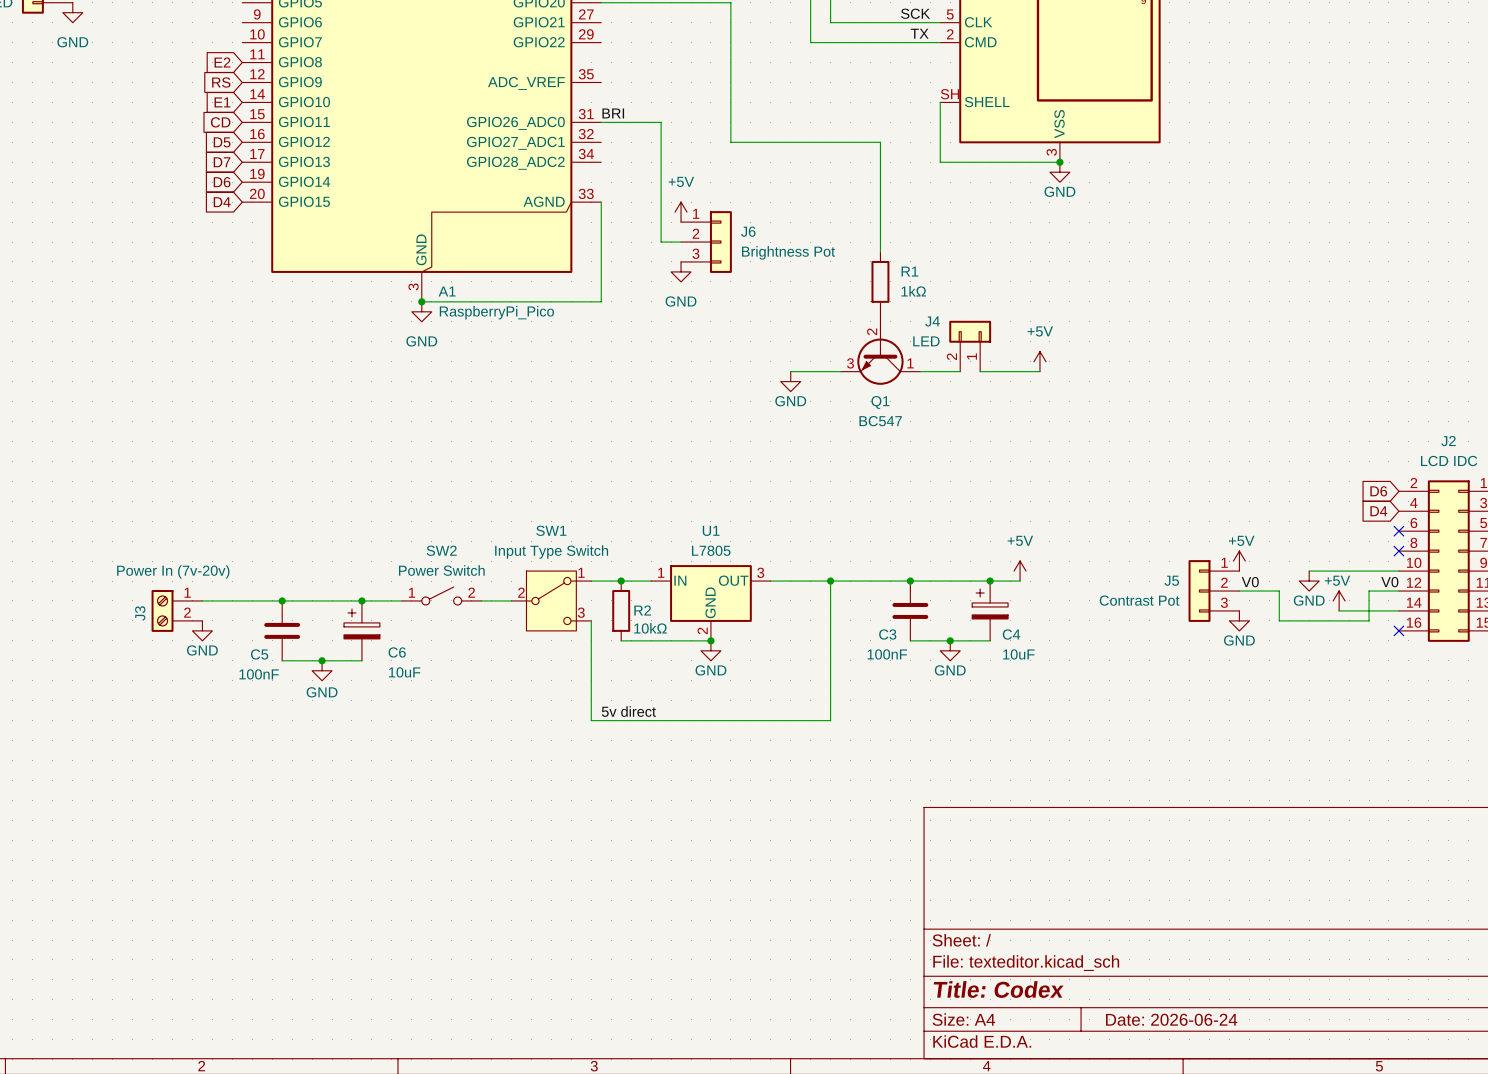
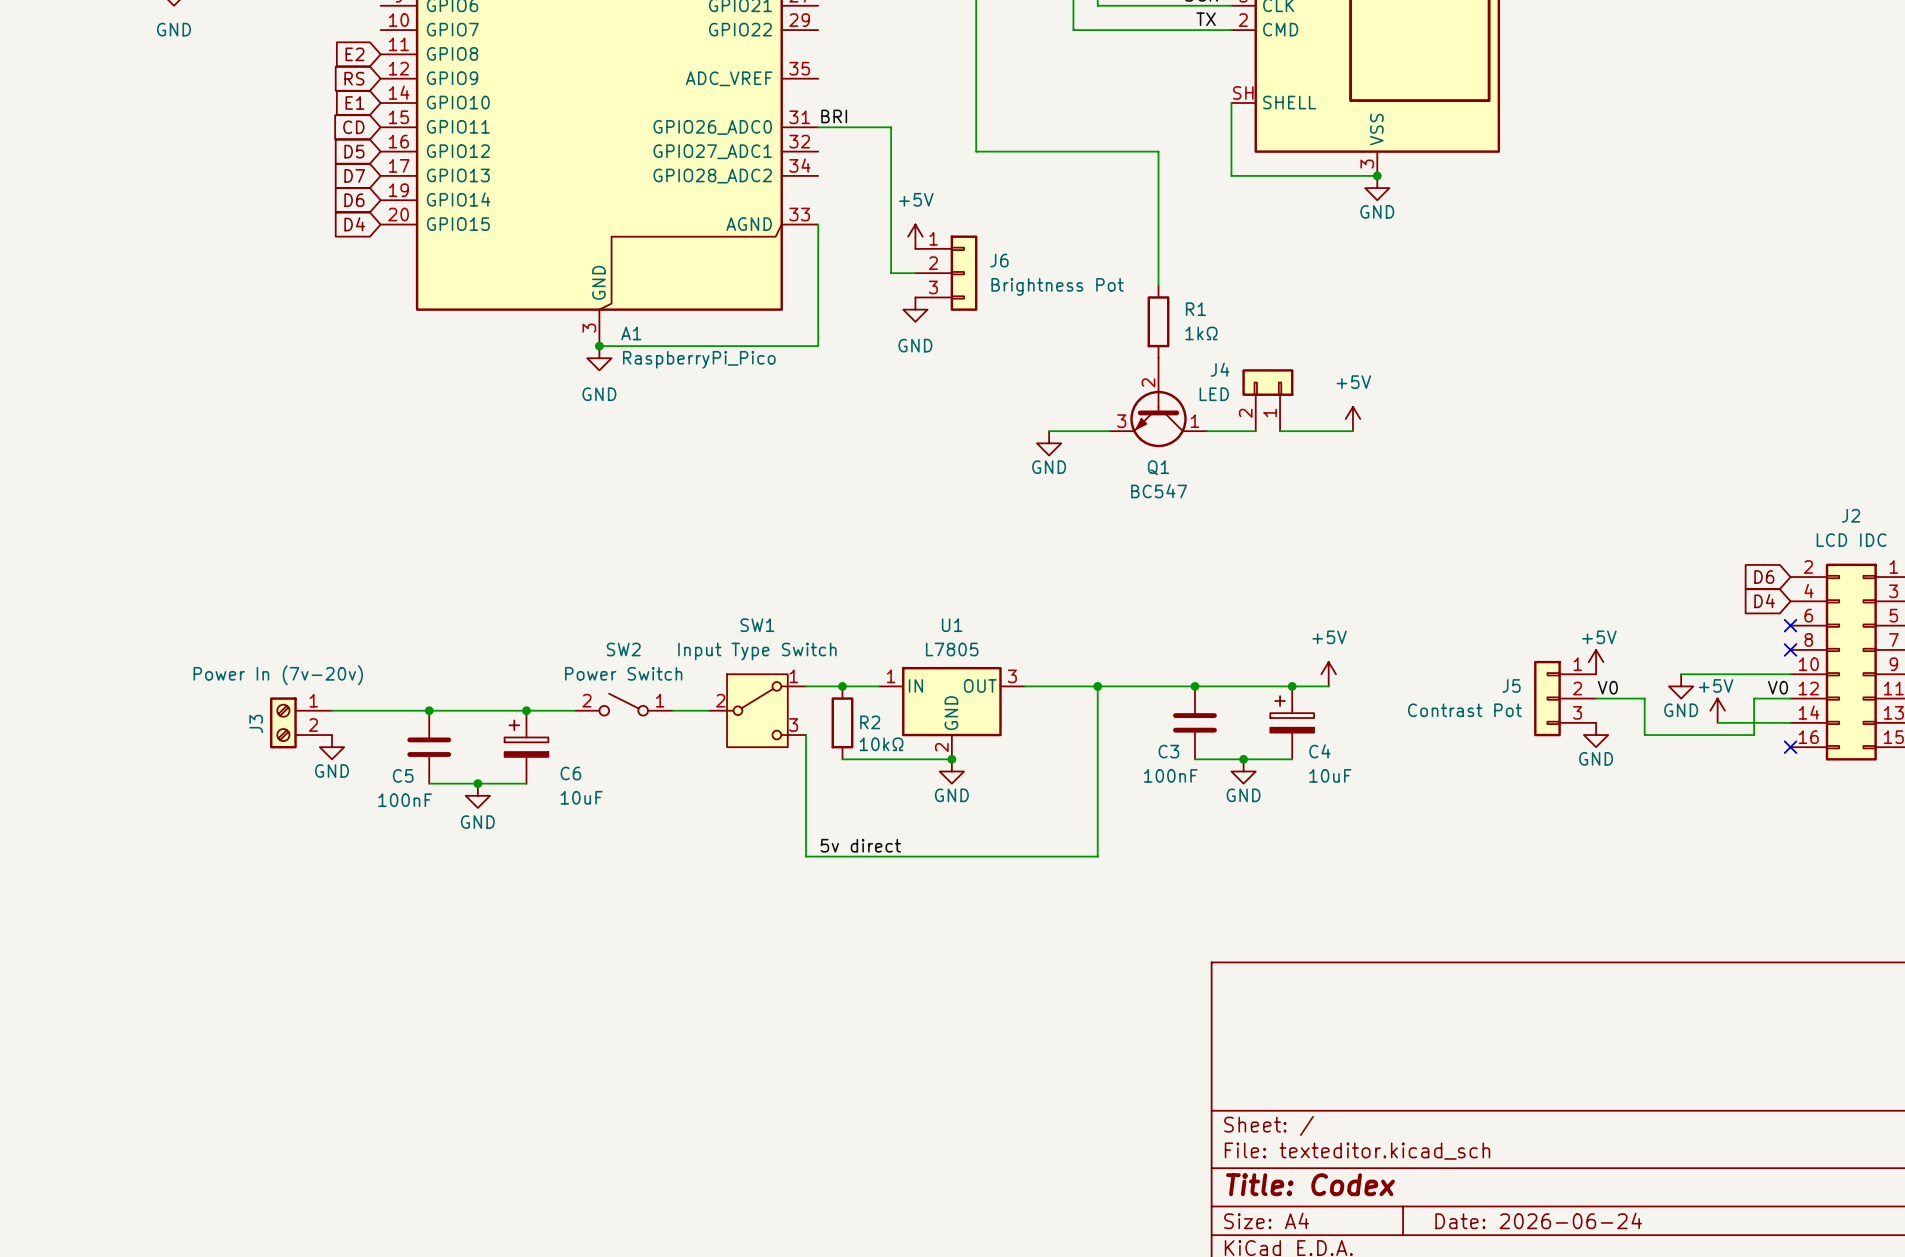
SW2 flip: as is (441, 596) -> left-right (623, 704)

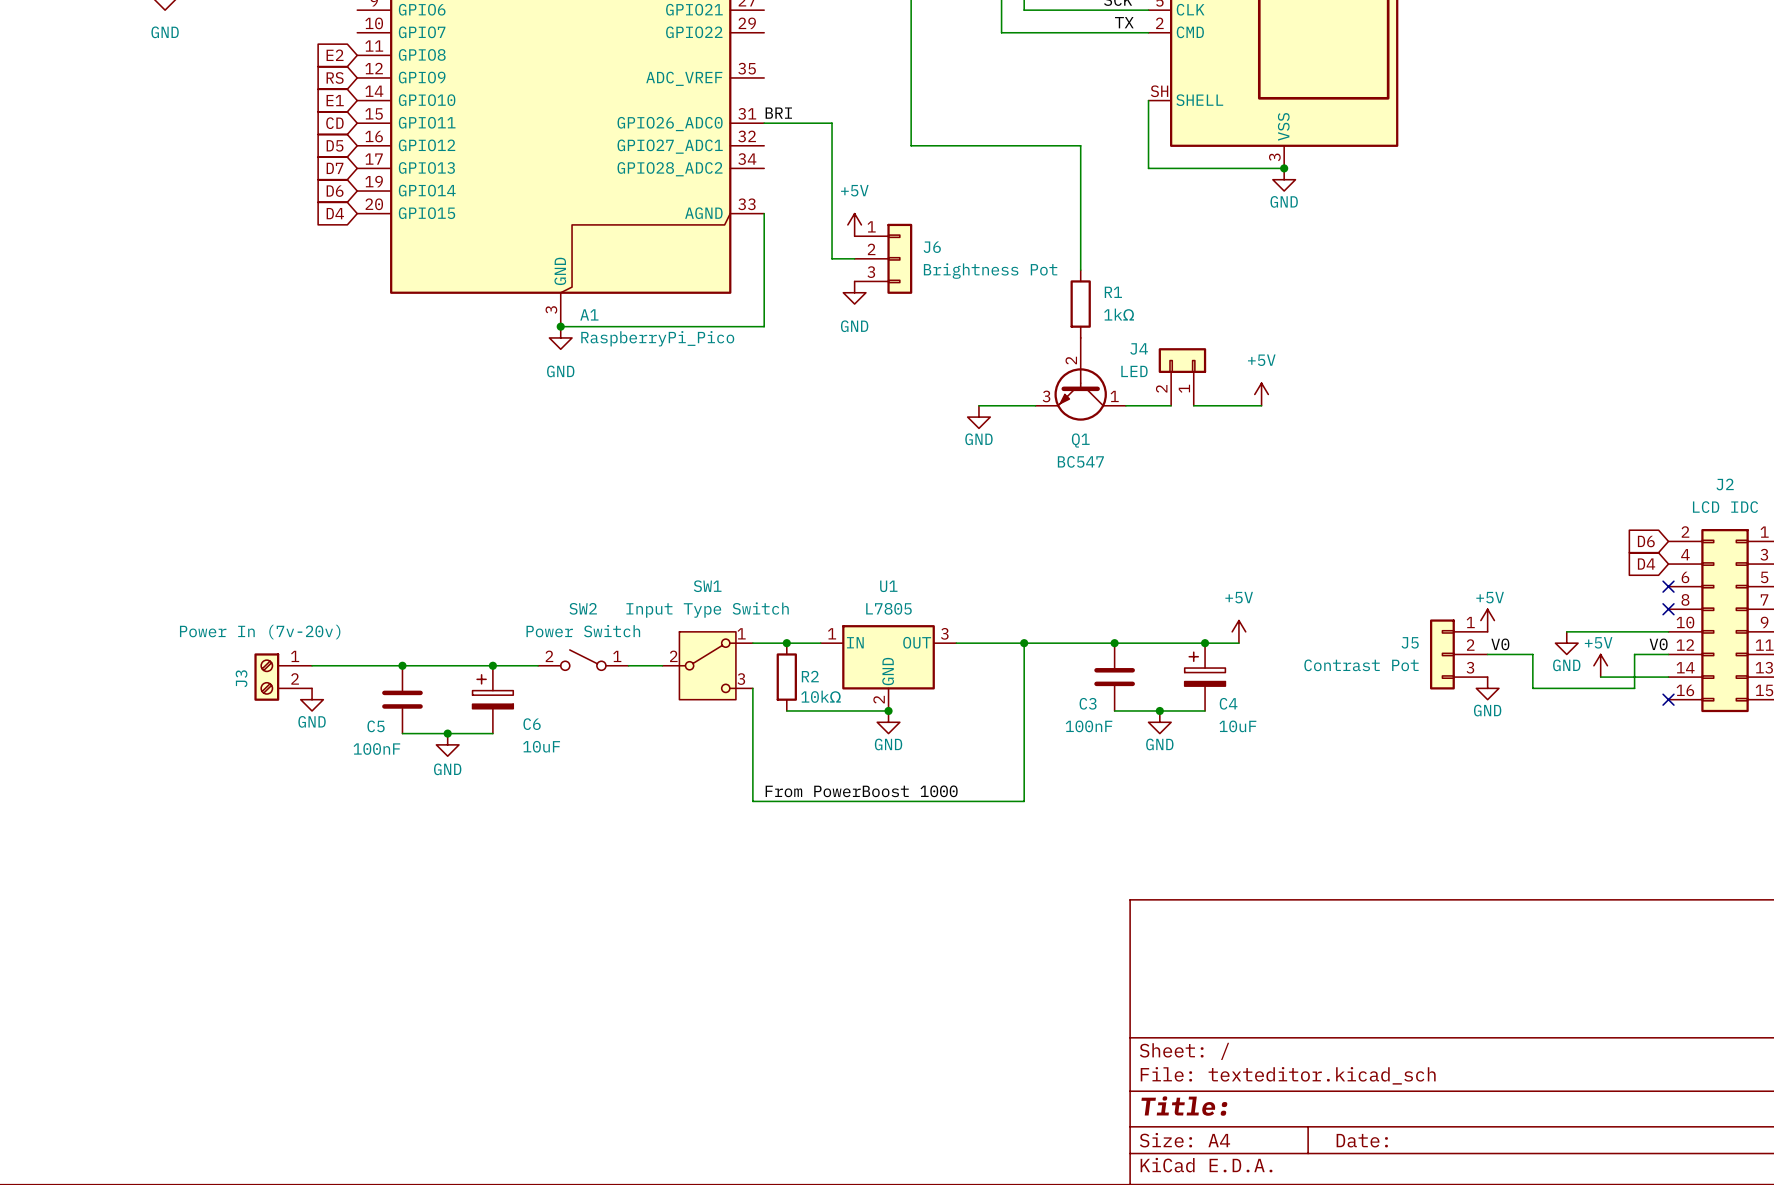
label: 5v direct (860, 845) -> From PowerBoost 1000 (861, 791)
title block: Title: Codex (1310, 1184) -> Title: (1184, 1106)
title block: Date: 2026-06-24 (1538, 1220) -> Date: (1362, 1140)

